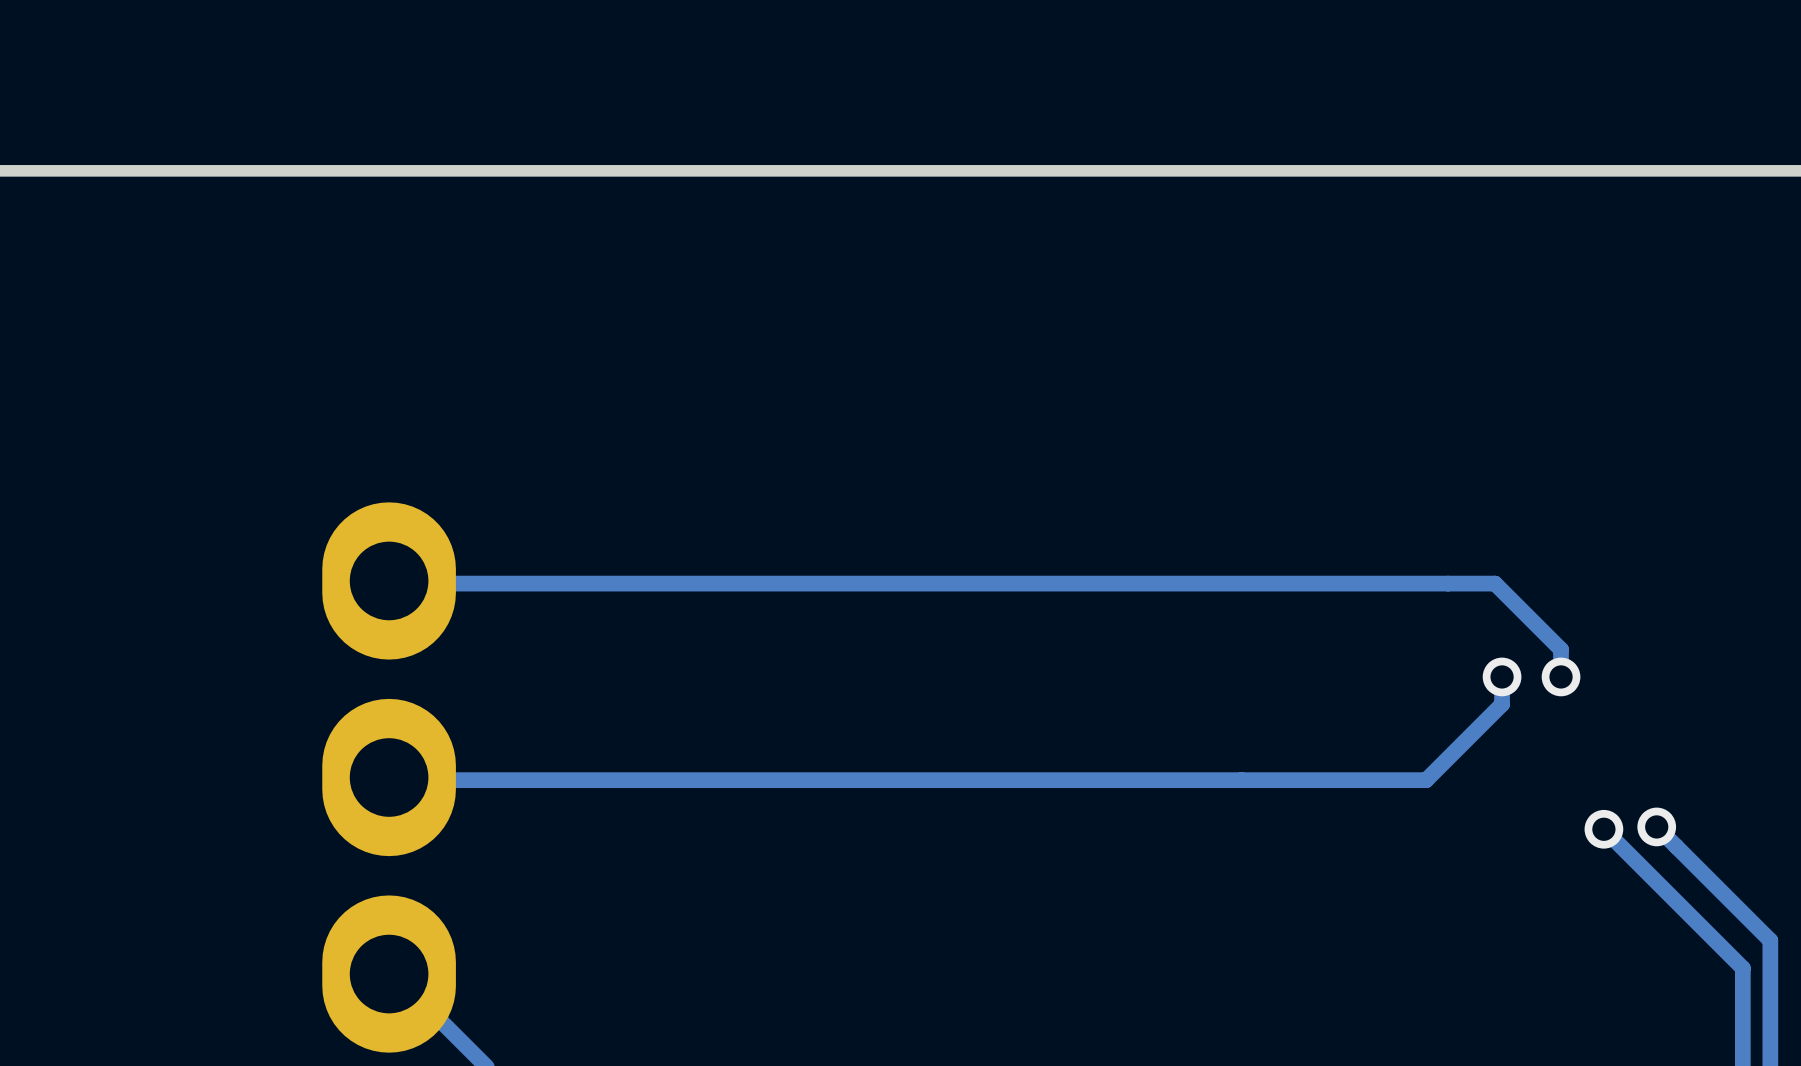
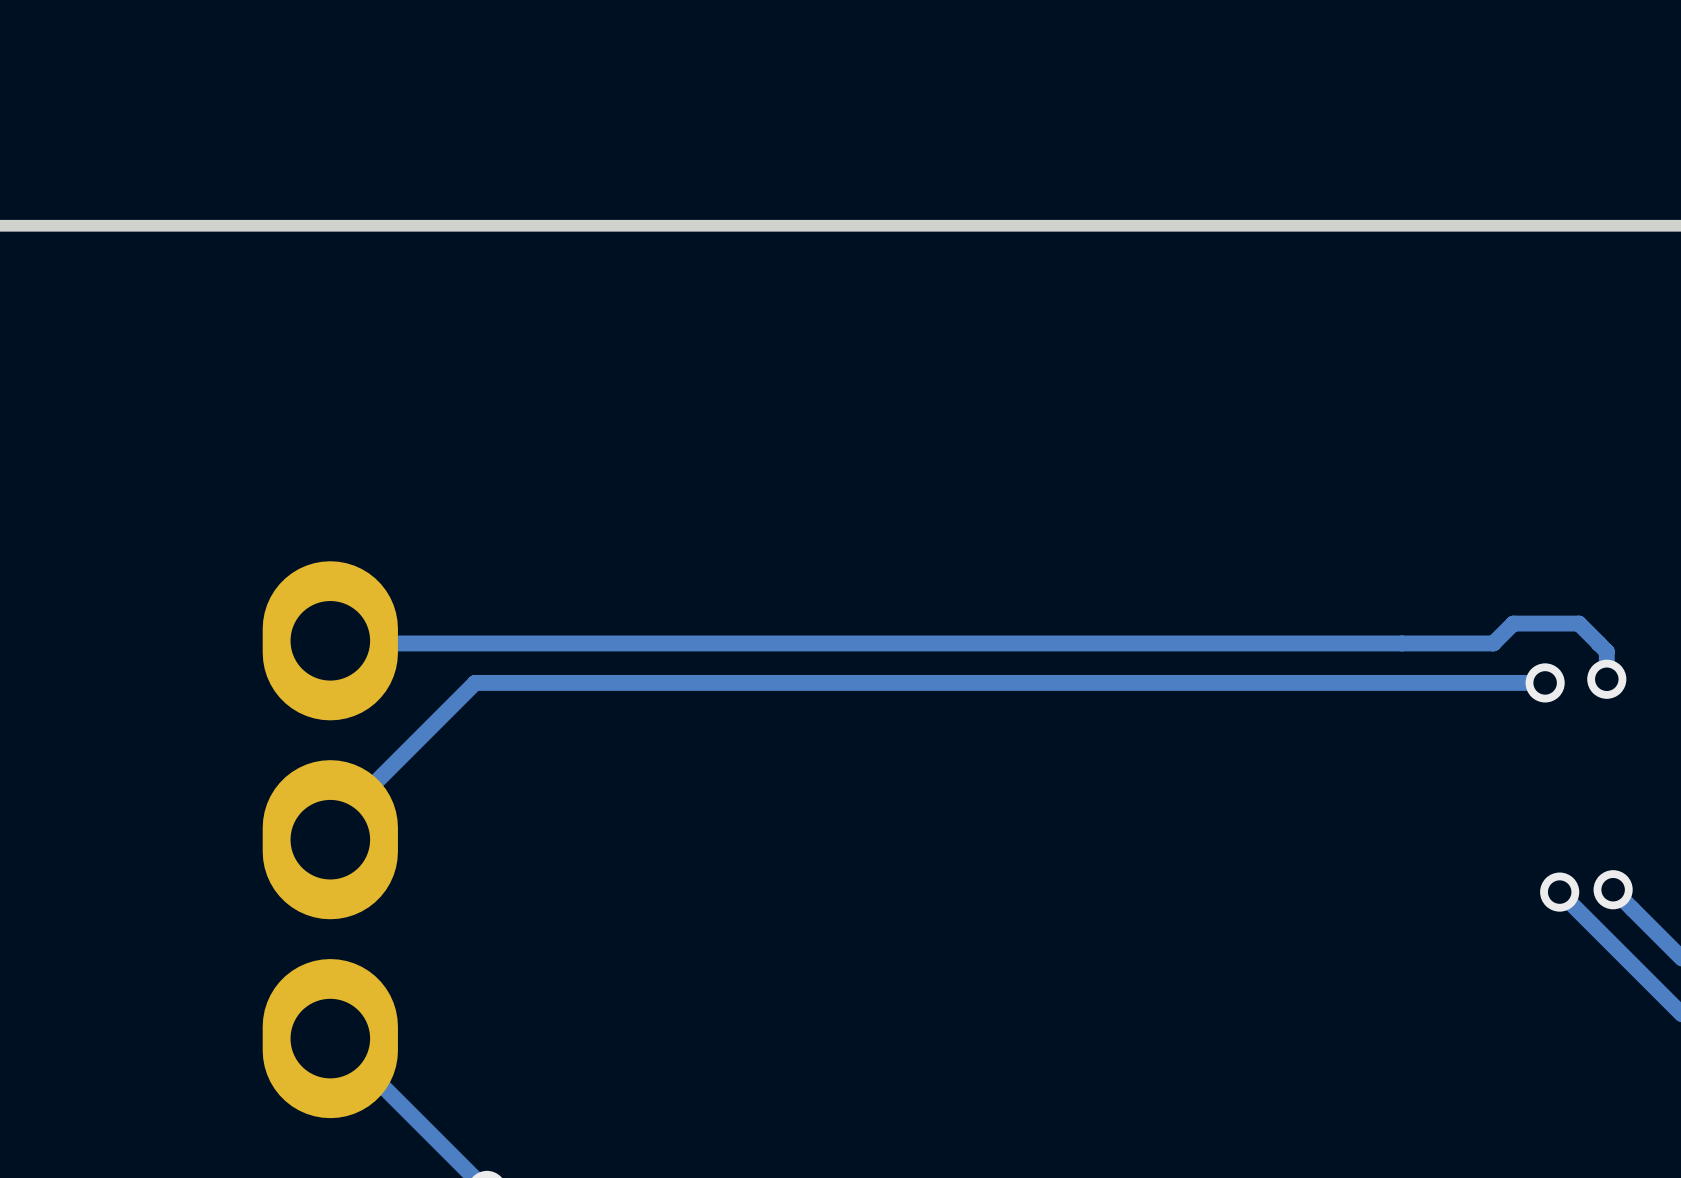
track: (1495, 583) (1561, 649) (1561, 676) -> (1449, 643) (1493, 643) (1513, 623) (1578, 623) (1606, 651) (1606, 679)
via: none -> (1606, 679)
track: none -> (1545, 682) (475, 682) (330, 827) (330, 839)
via: none -> (1545, 682)
track: (1502, 676) (1502, 704) (1426, 780) (381, 780) -> none
via: (1502, 676) -> none
via: (1561, 676) -> none

